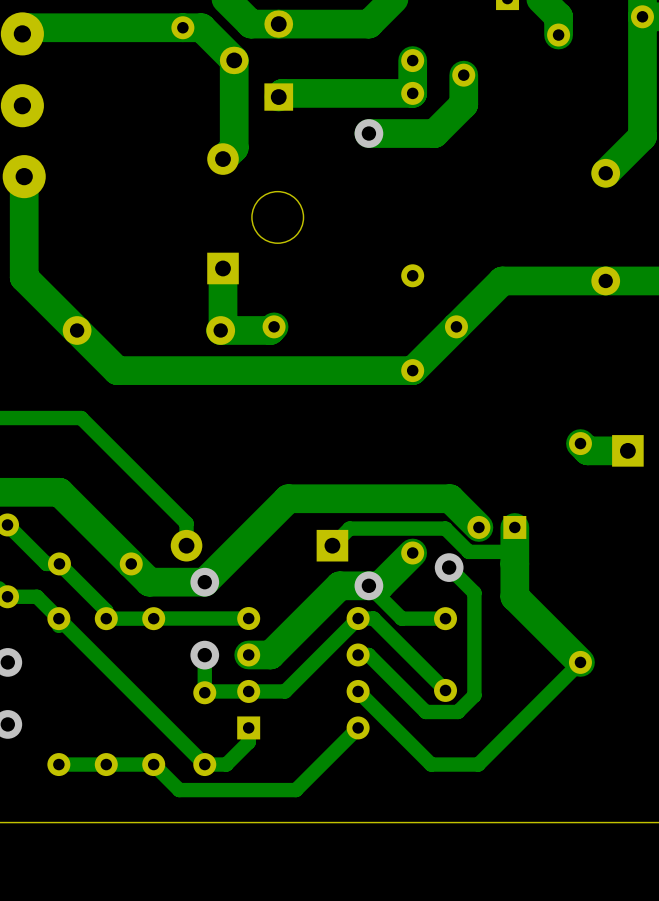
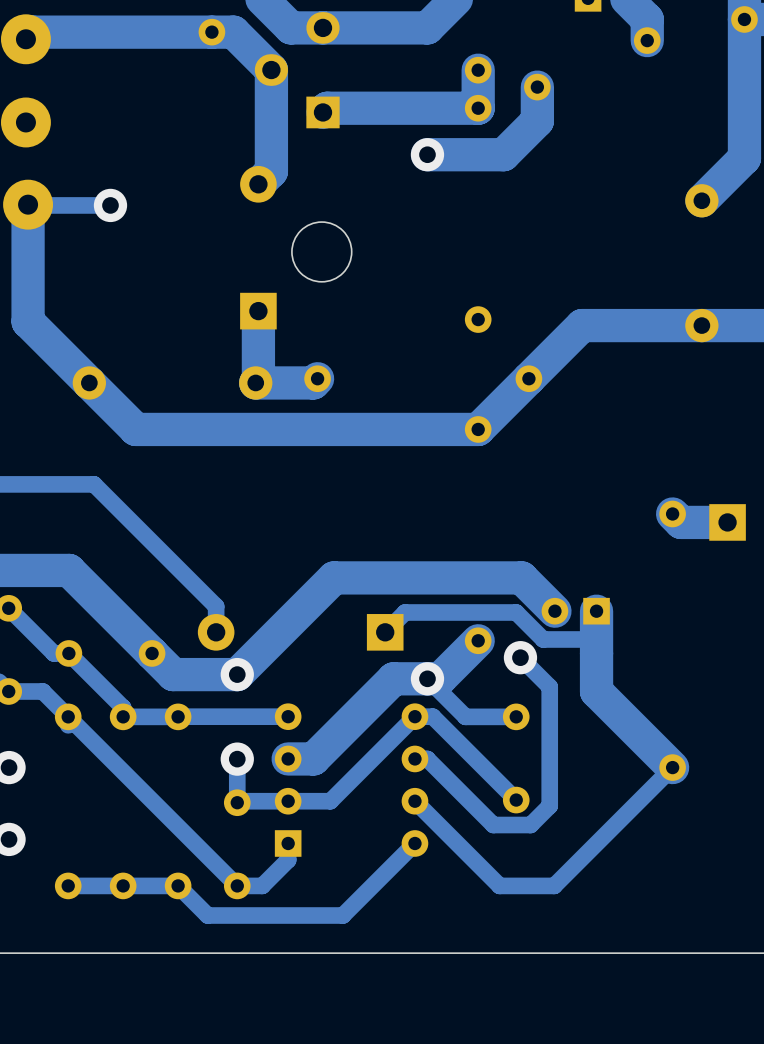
track: none -> (110, 205) (28, 205)
via: none -> (110, 205)

